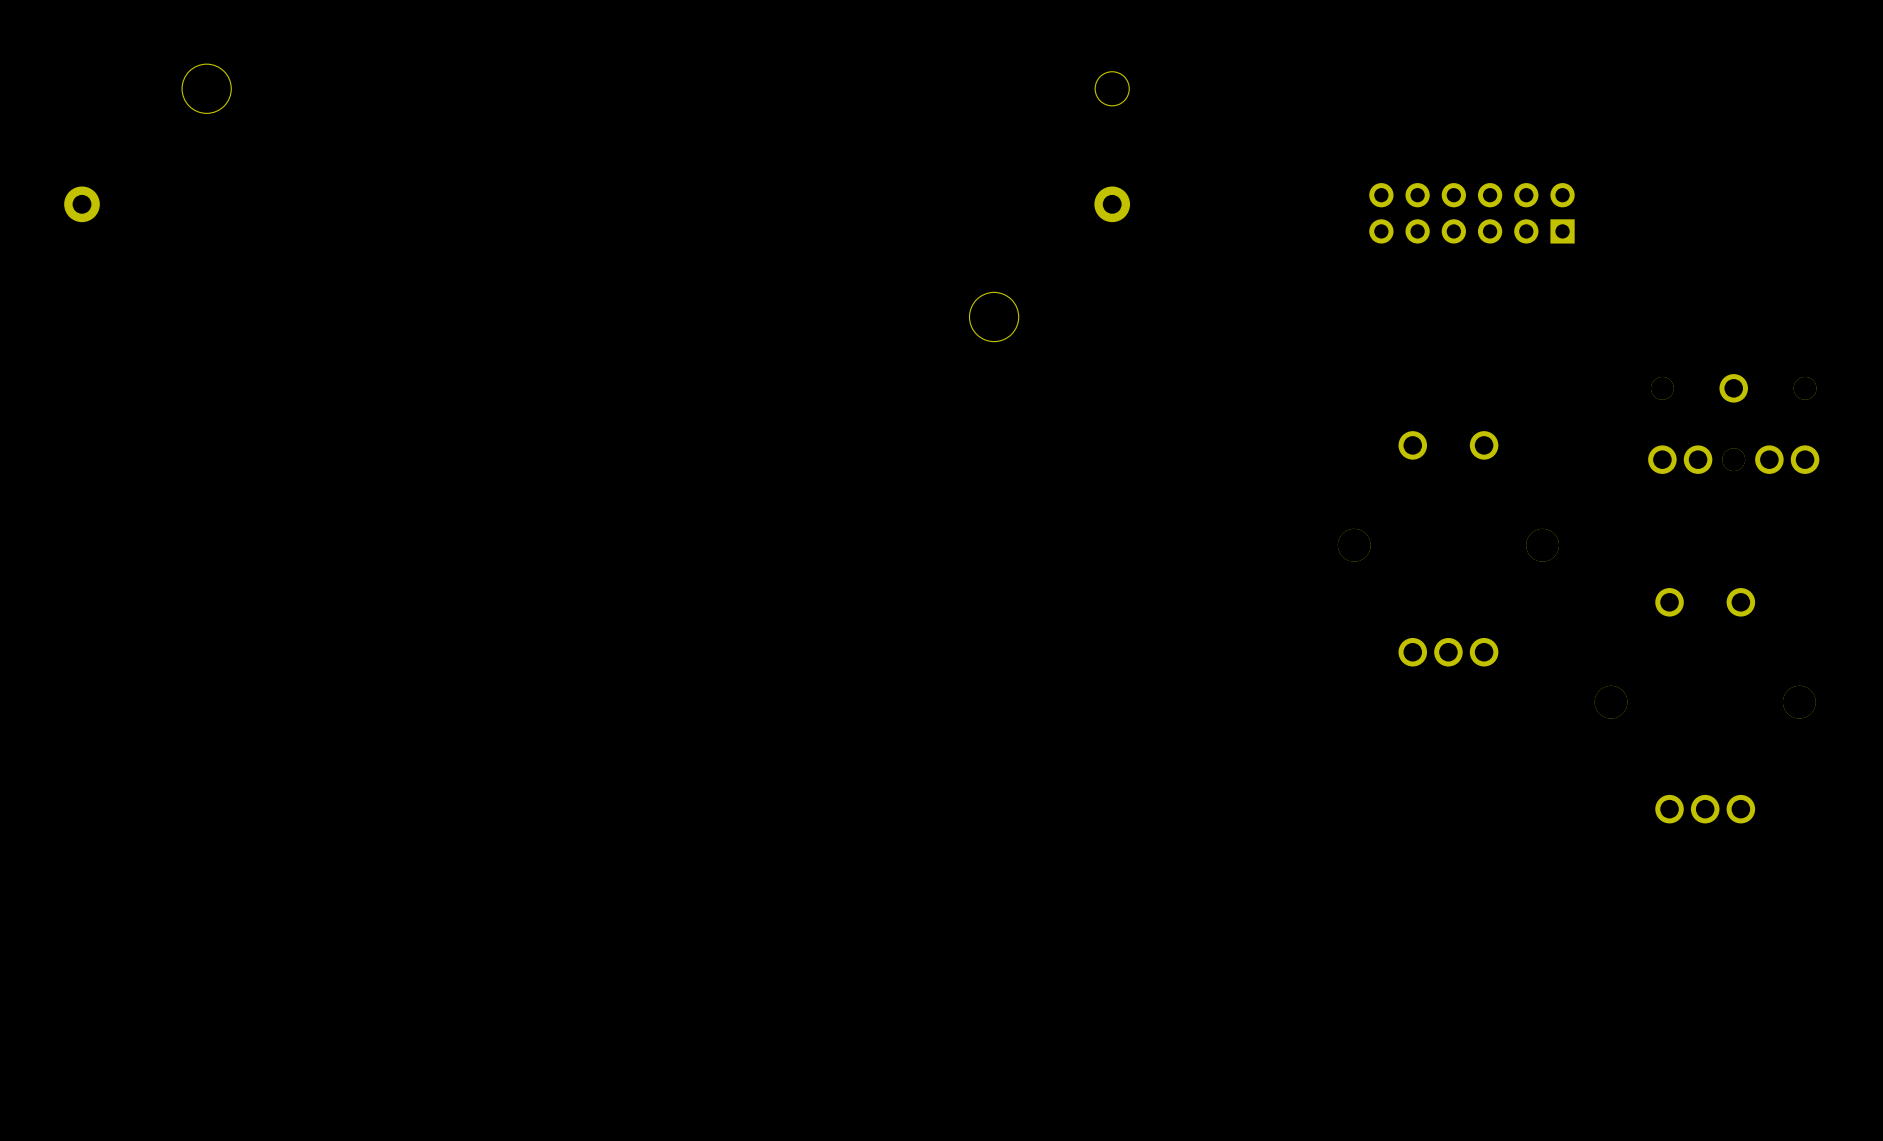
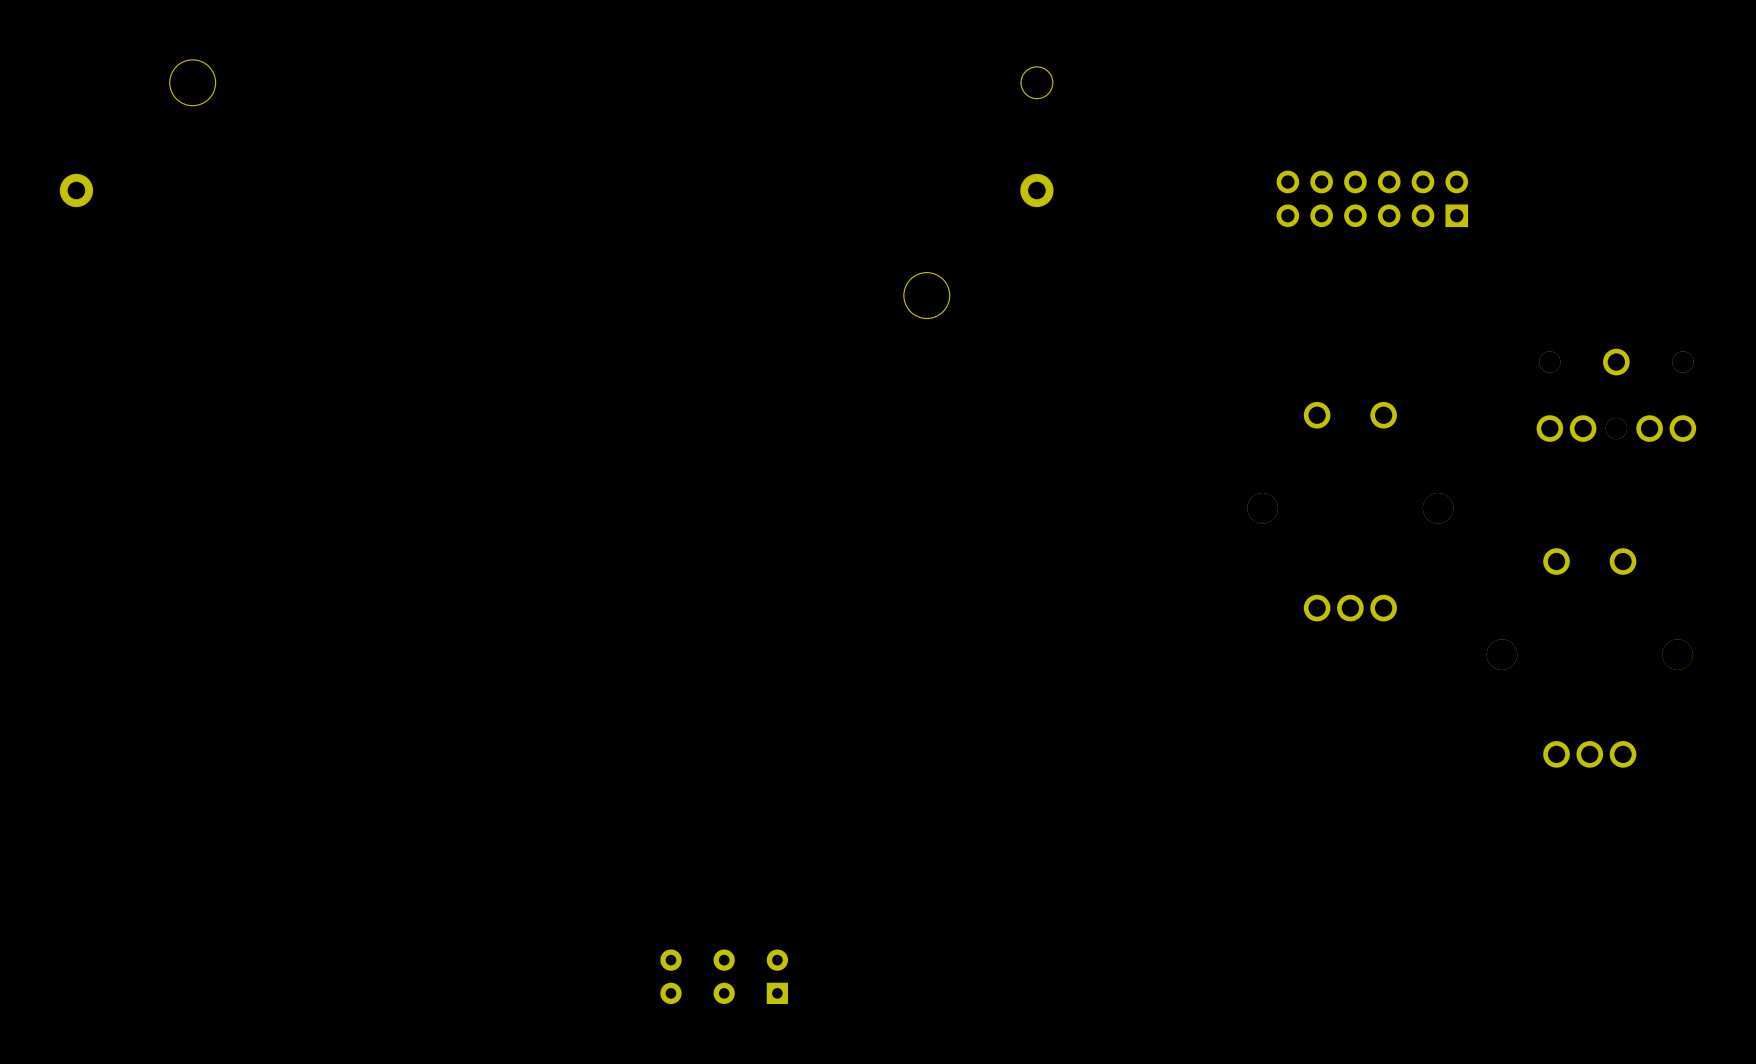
part: none -> (724, 976)

